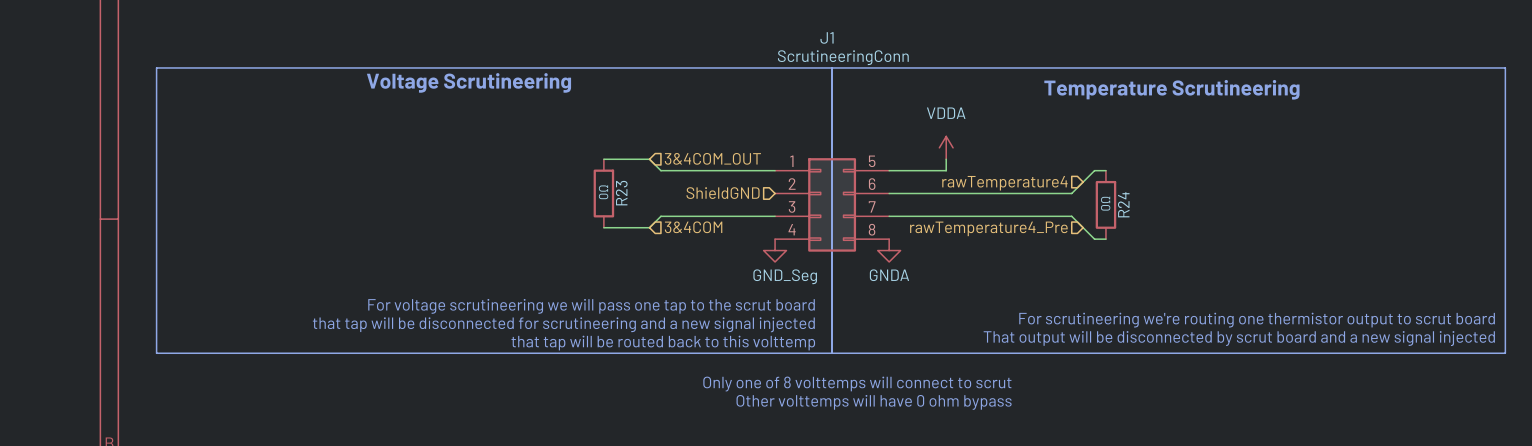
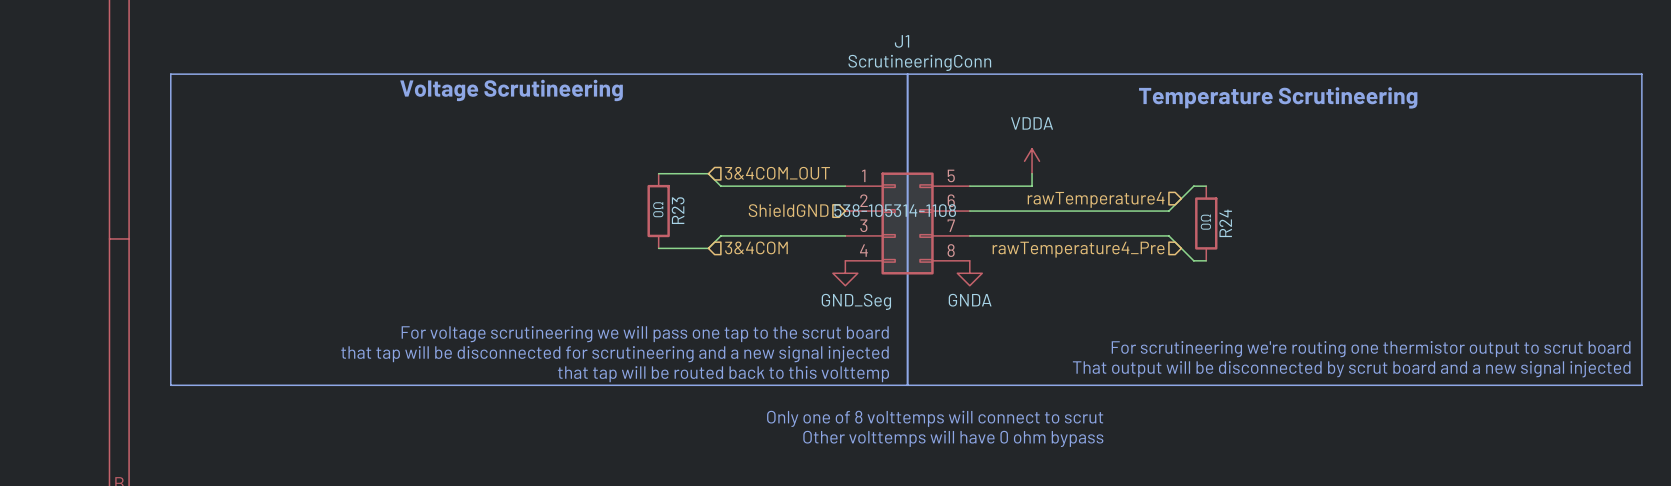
J1 text: none -> 538-105314-1108 (895, 210)

